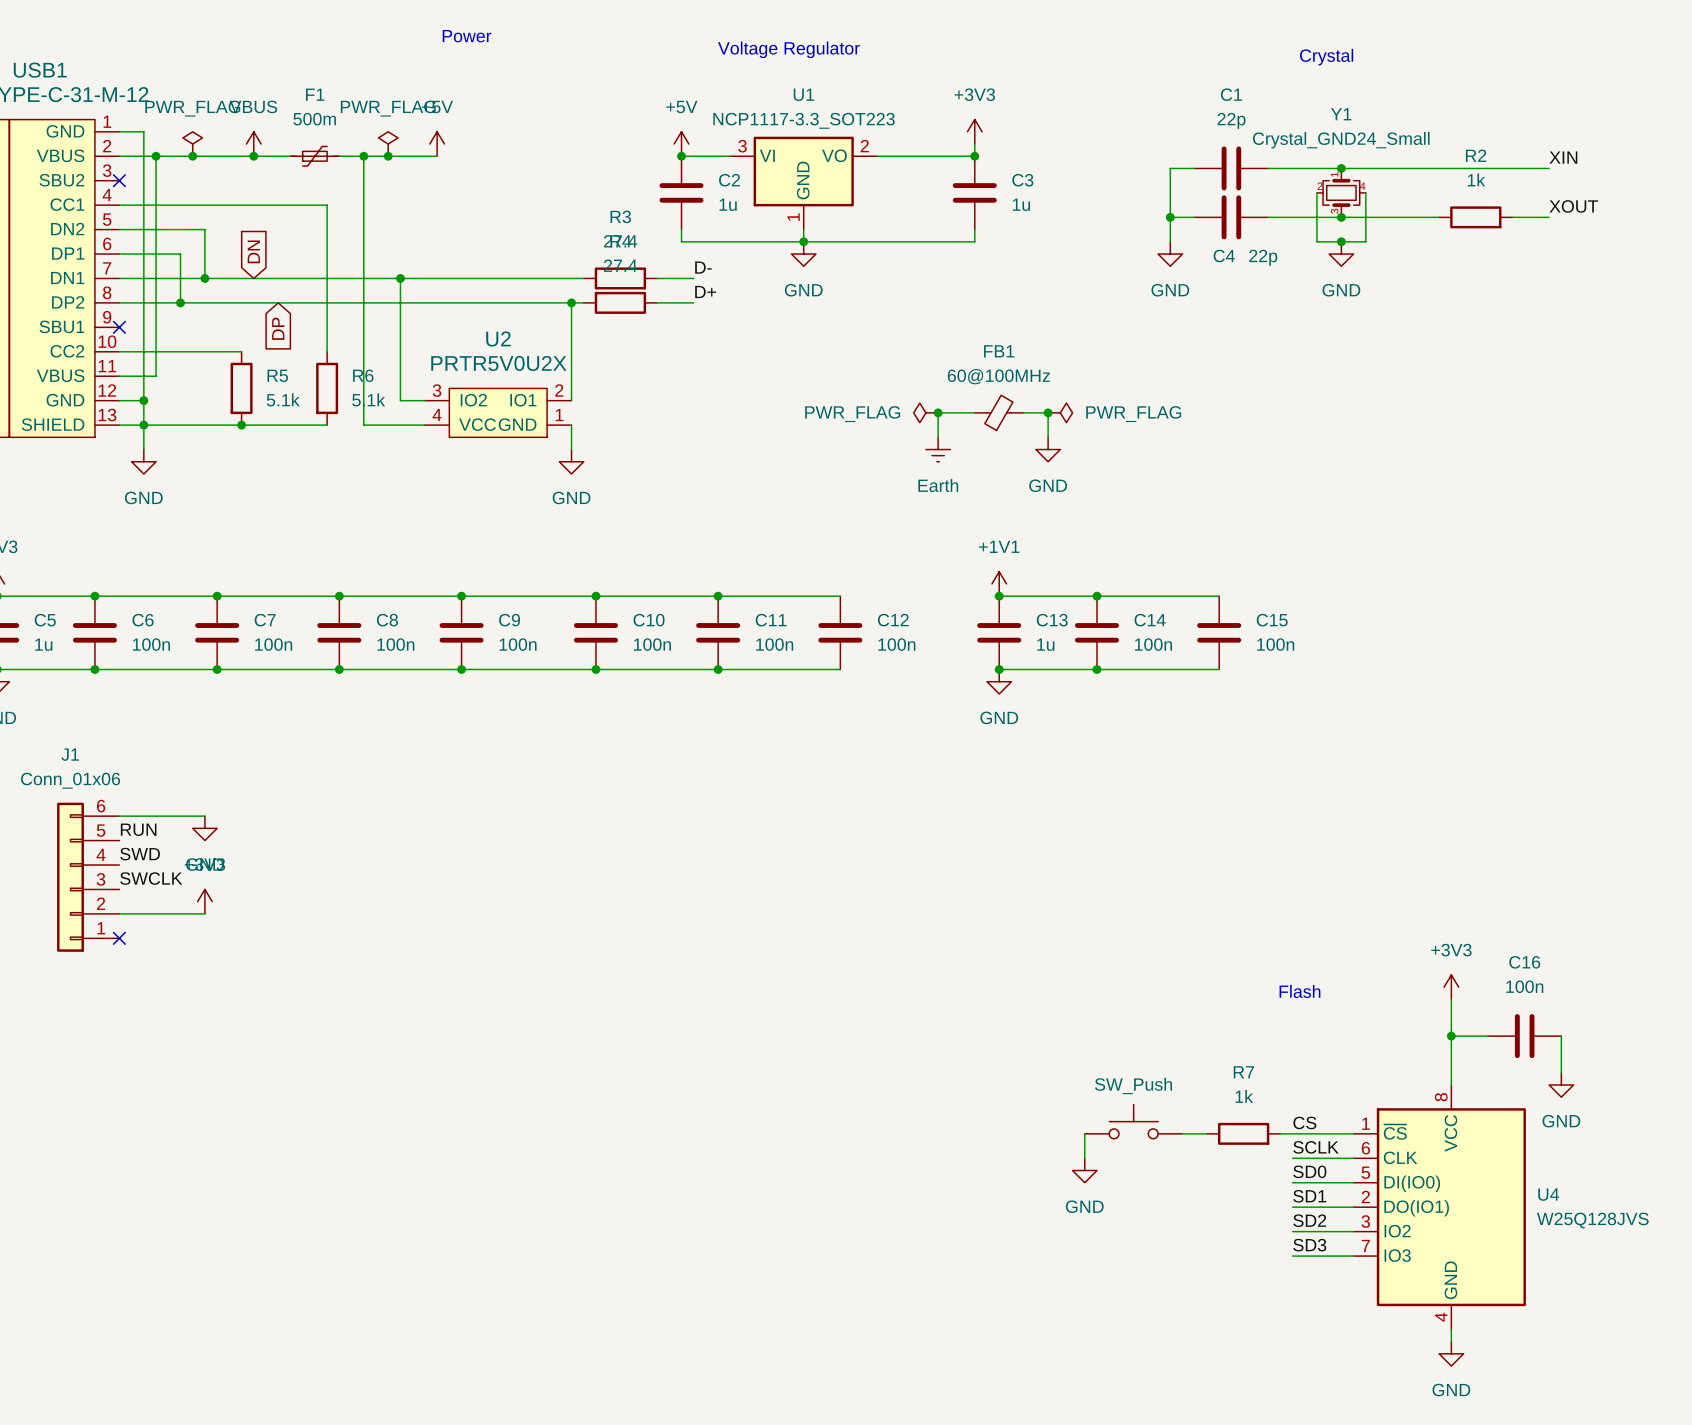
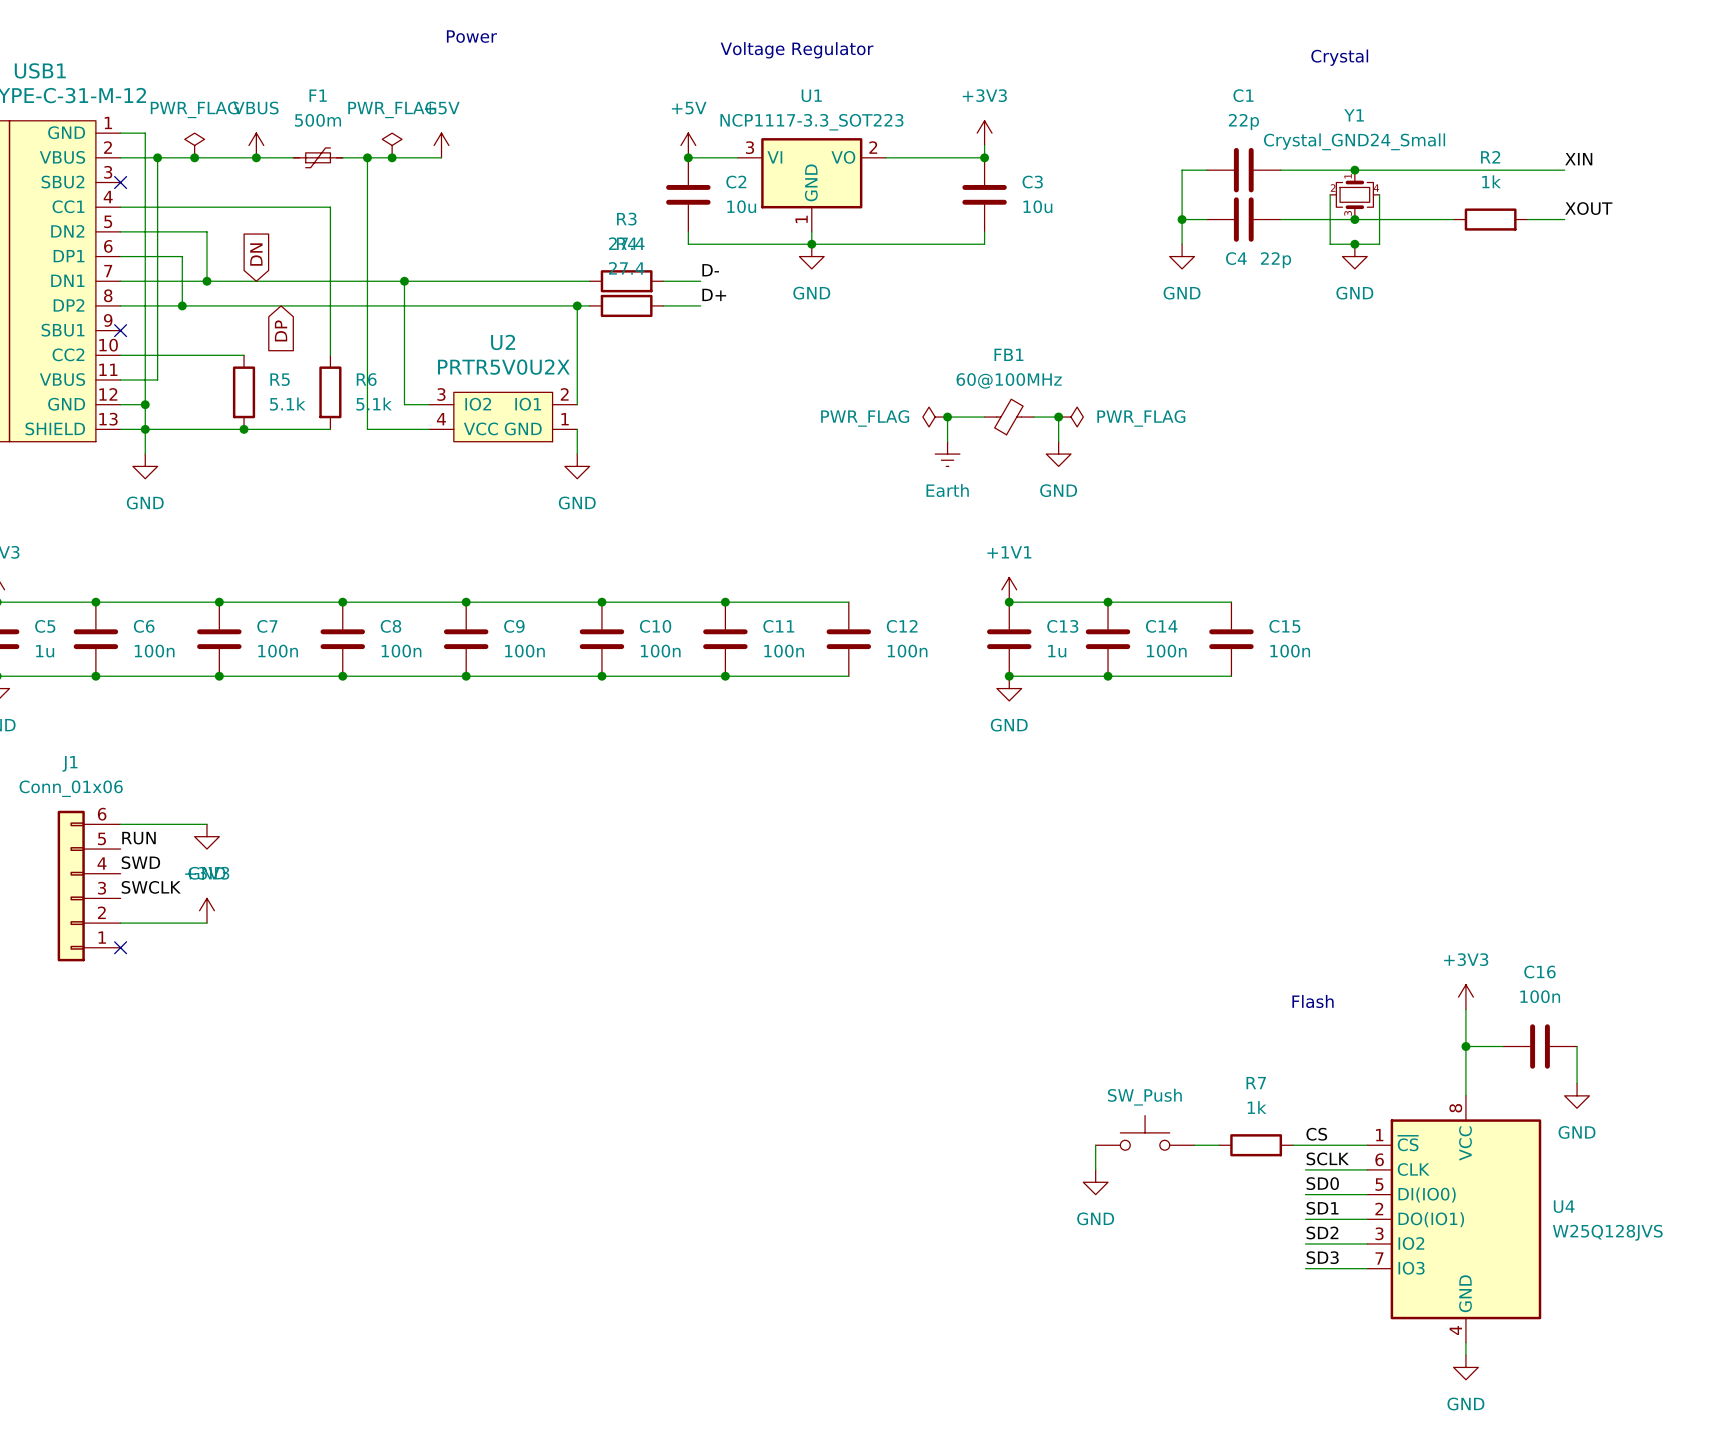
C2 value: 1u (728, 204) -> 10u (741, 206)
C3 value: 1u (1021, 204) -> 10u (1037, 206)

